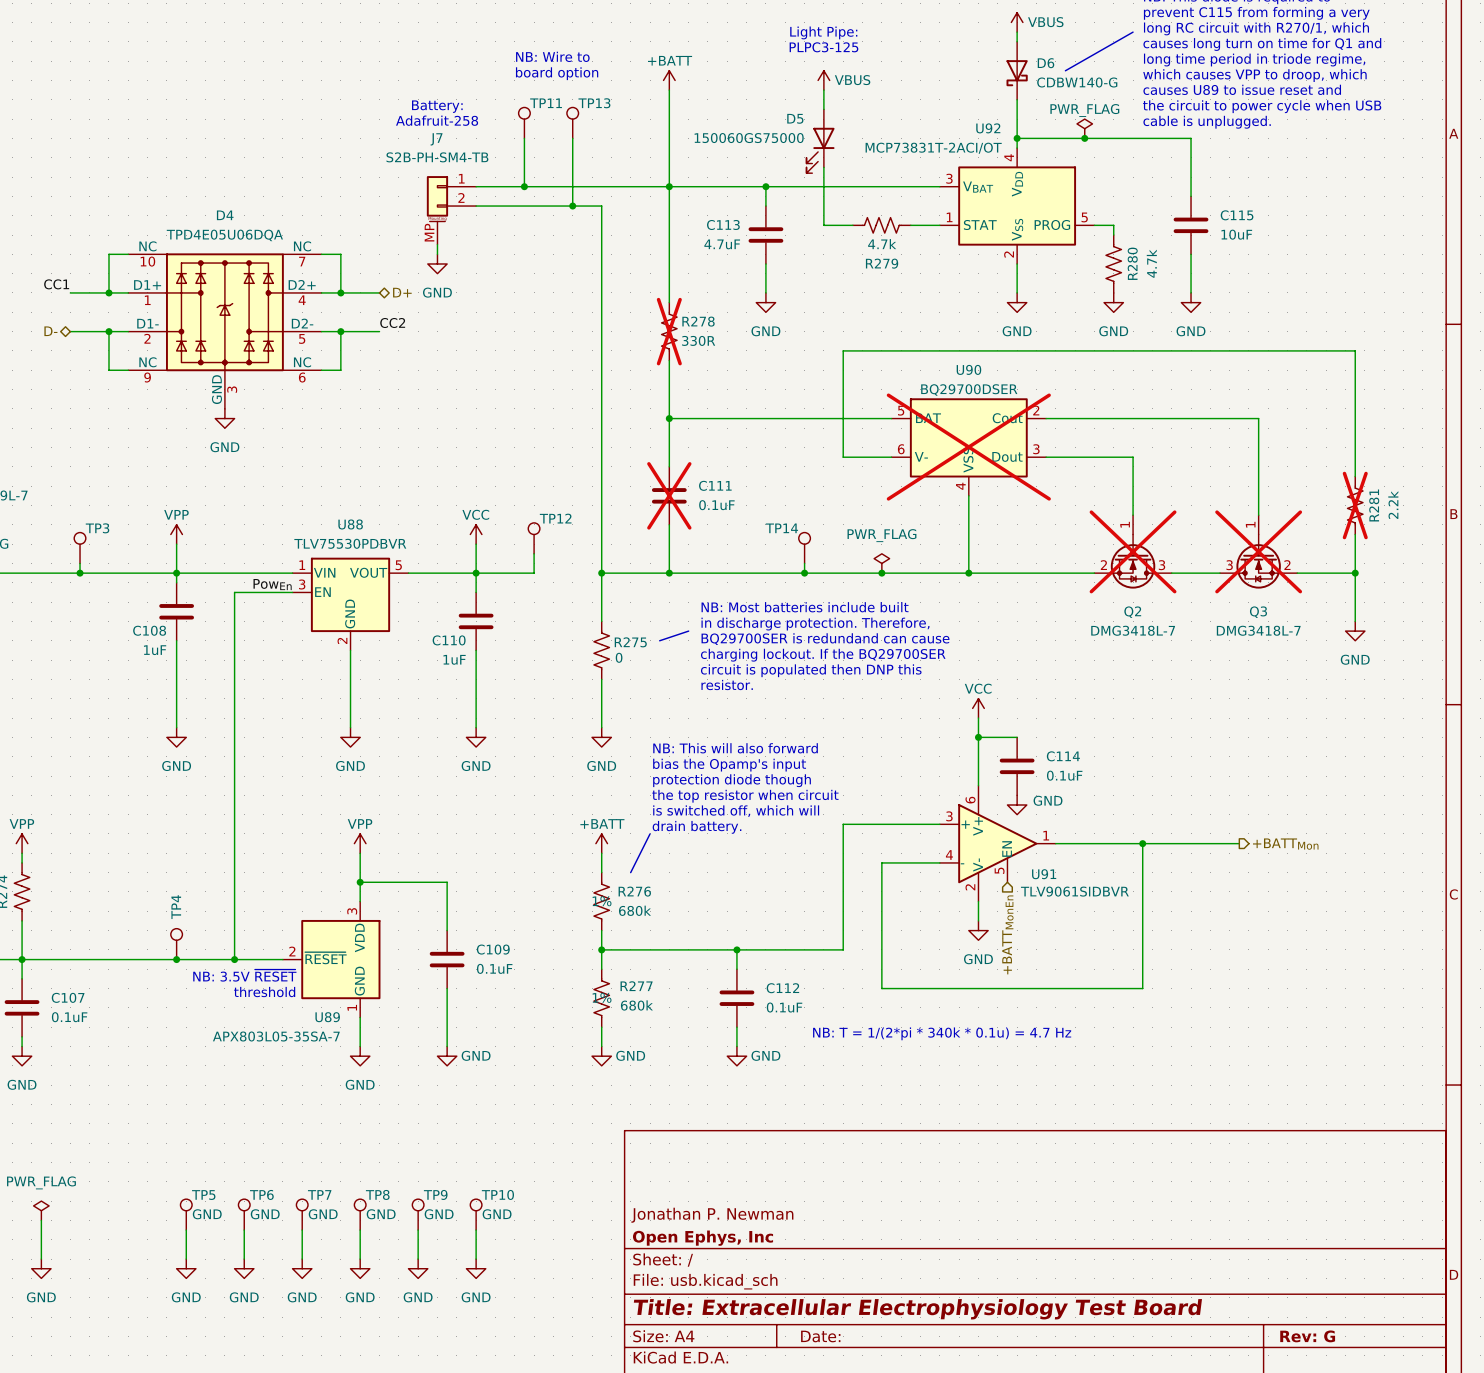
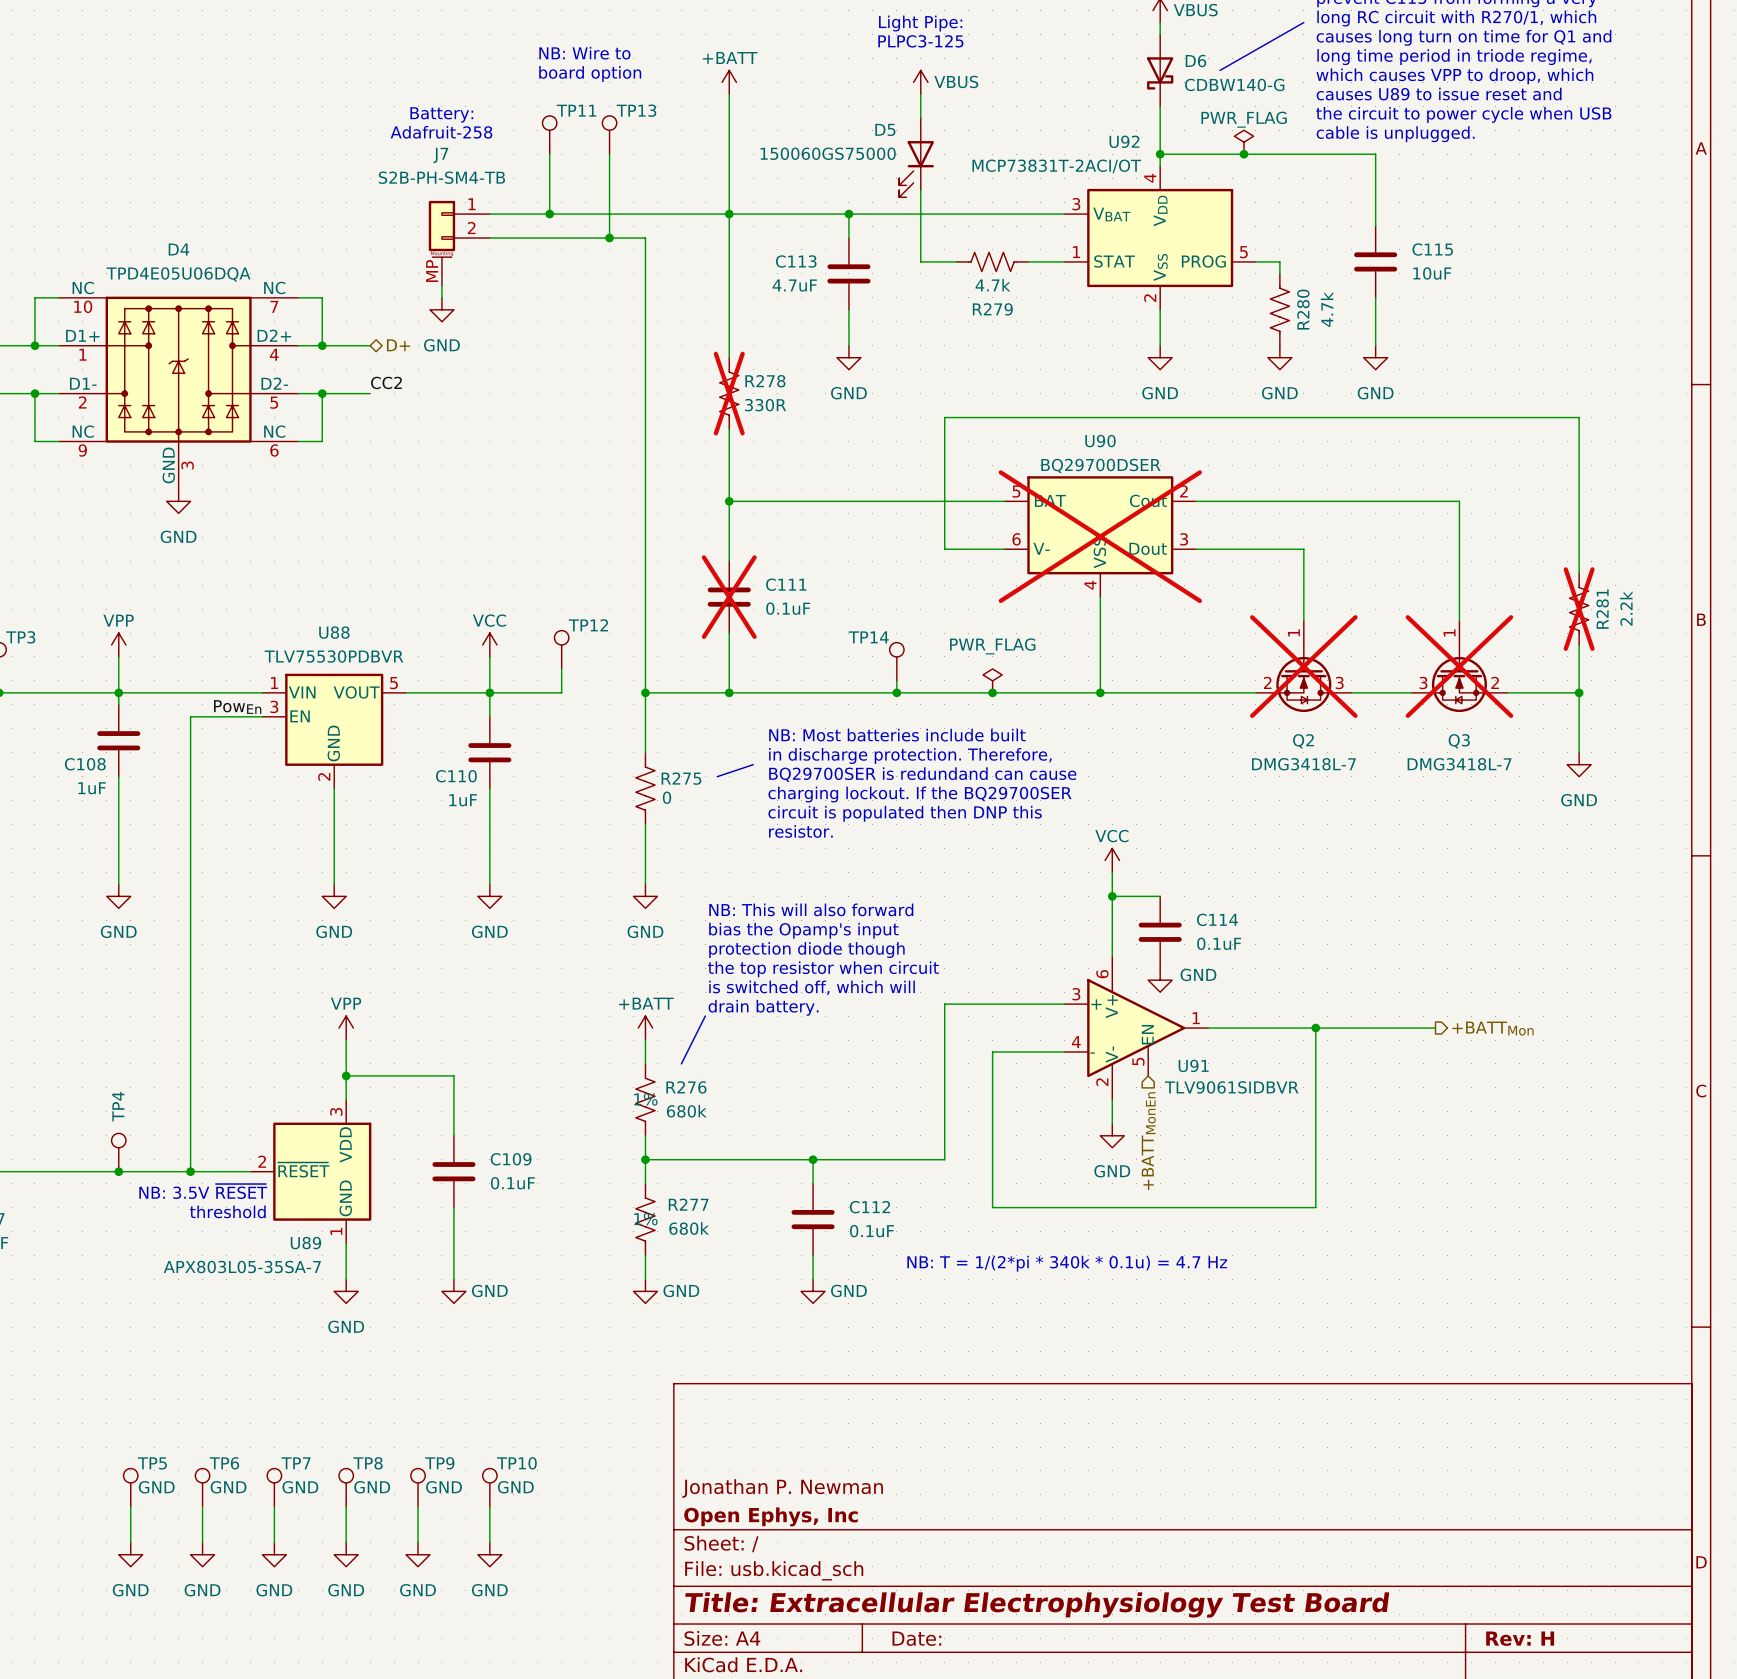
title block: Rev: G (1307, 1336) -> Rev: H (1520, 1638)

